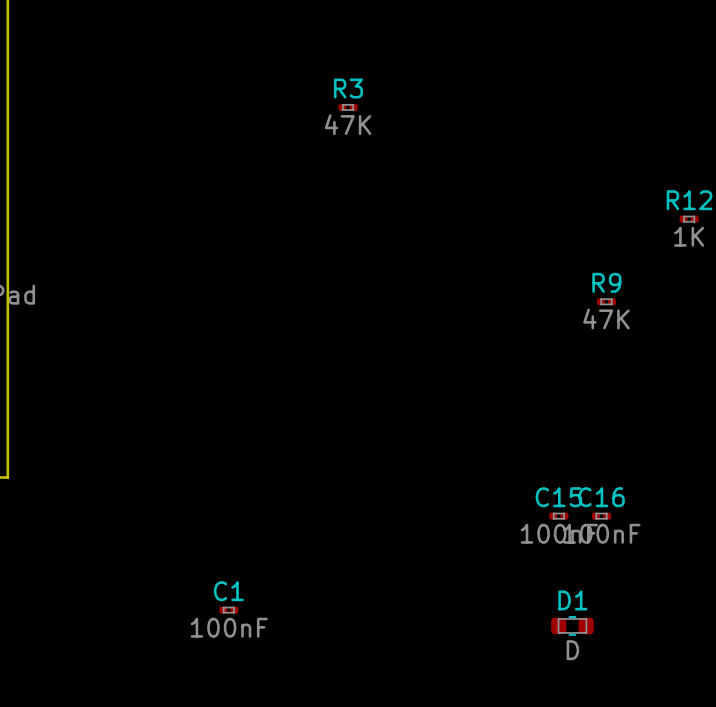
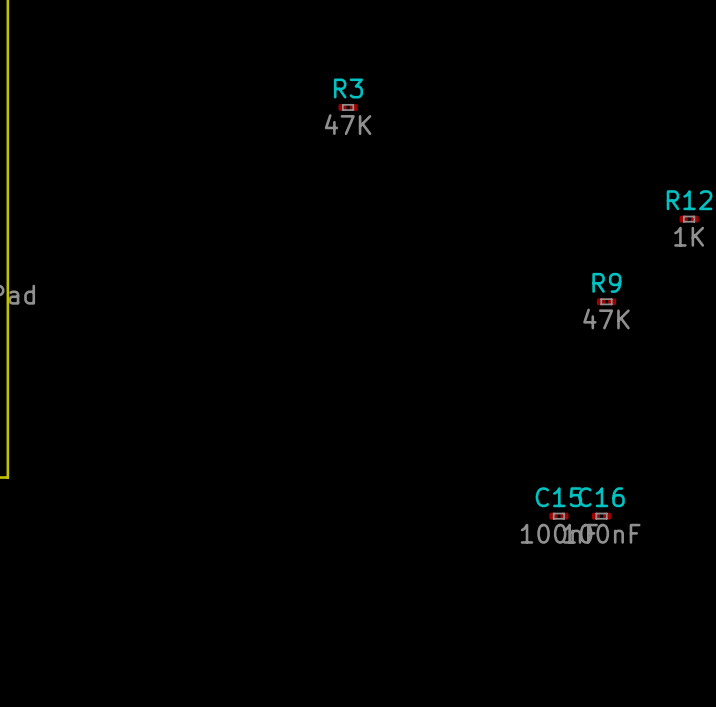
C1: 100nF (228, 610) -> none
D1: D (572, 625) -> none

